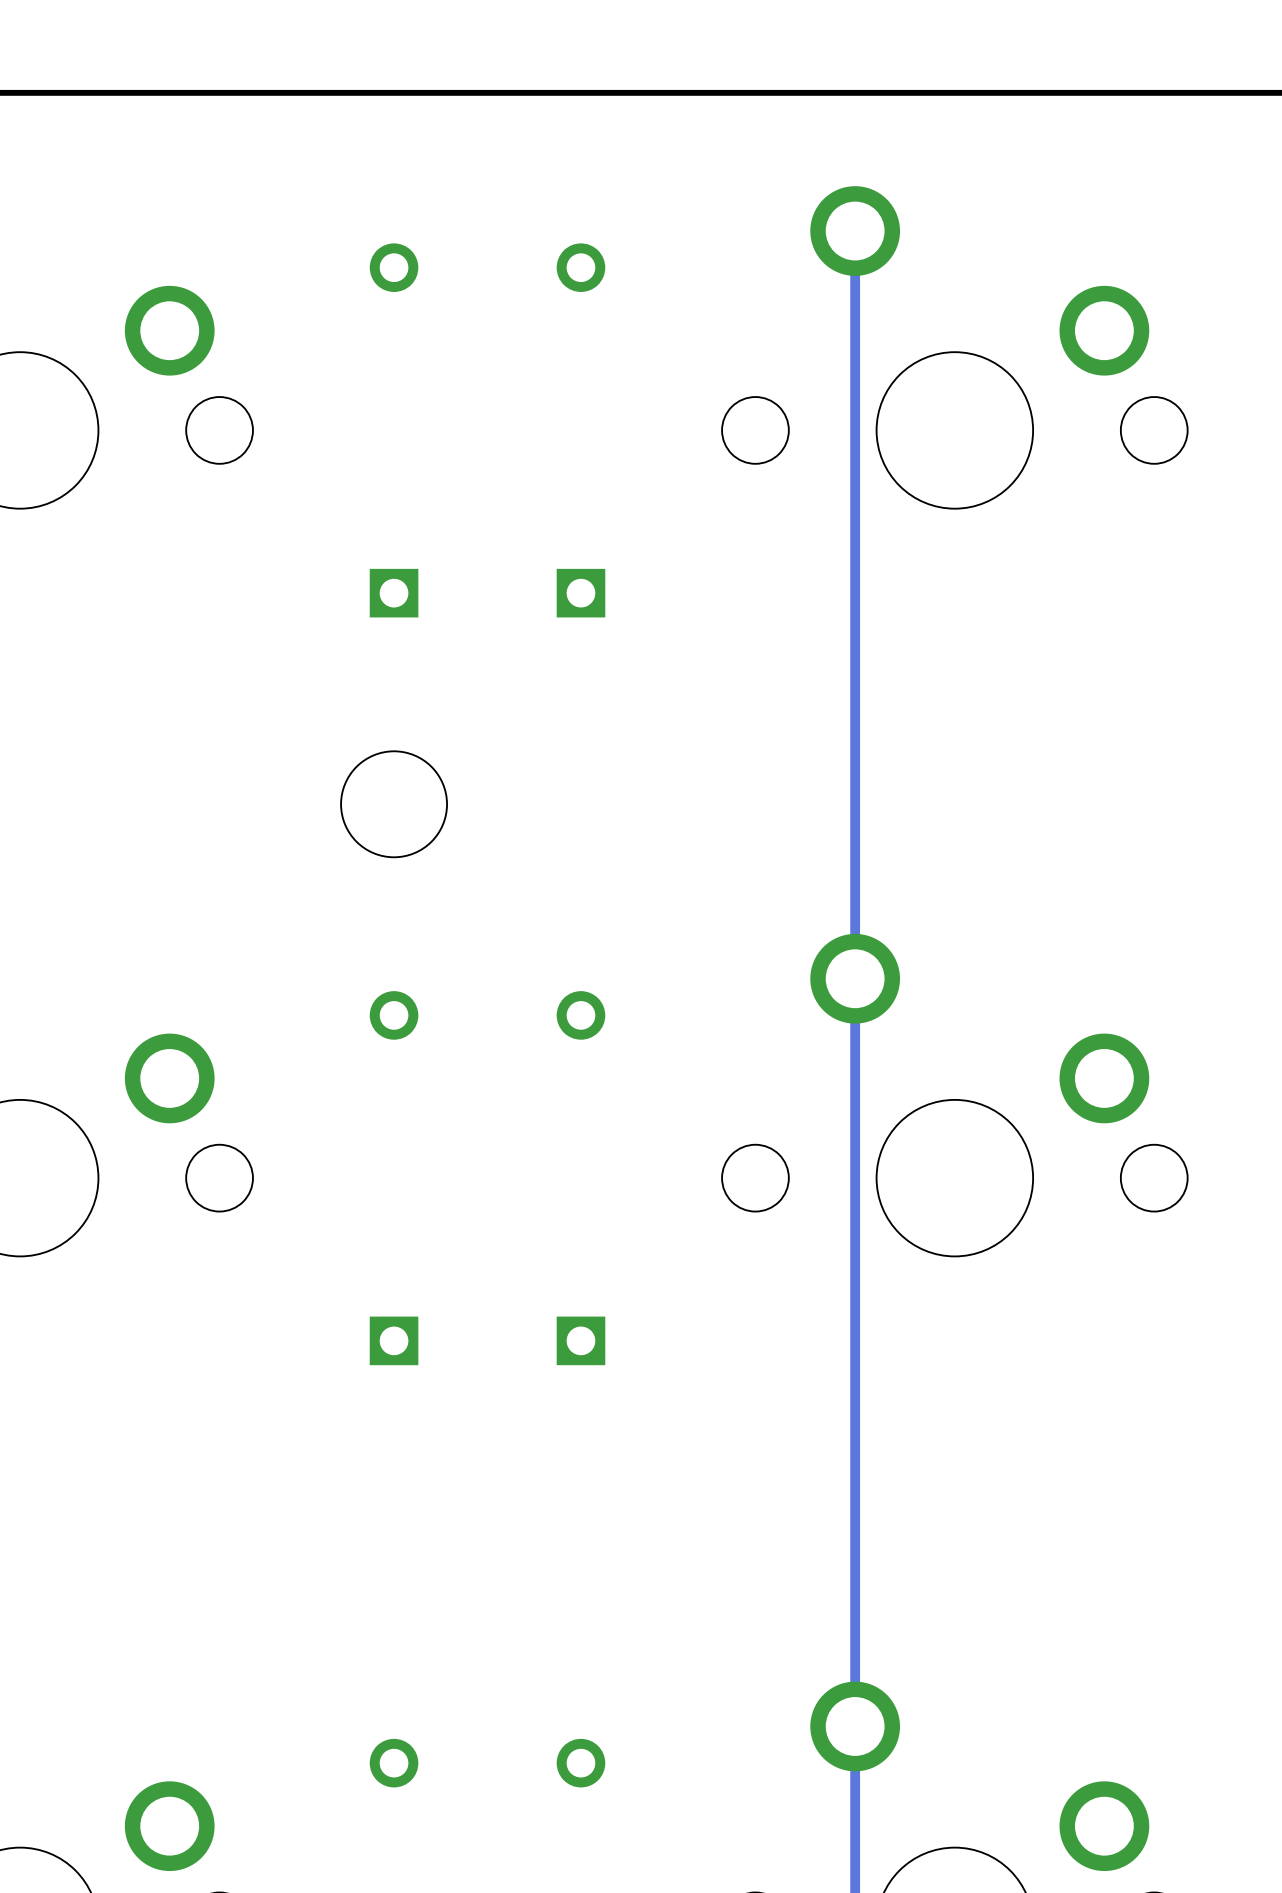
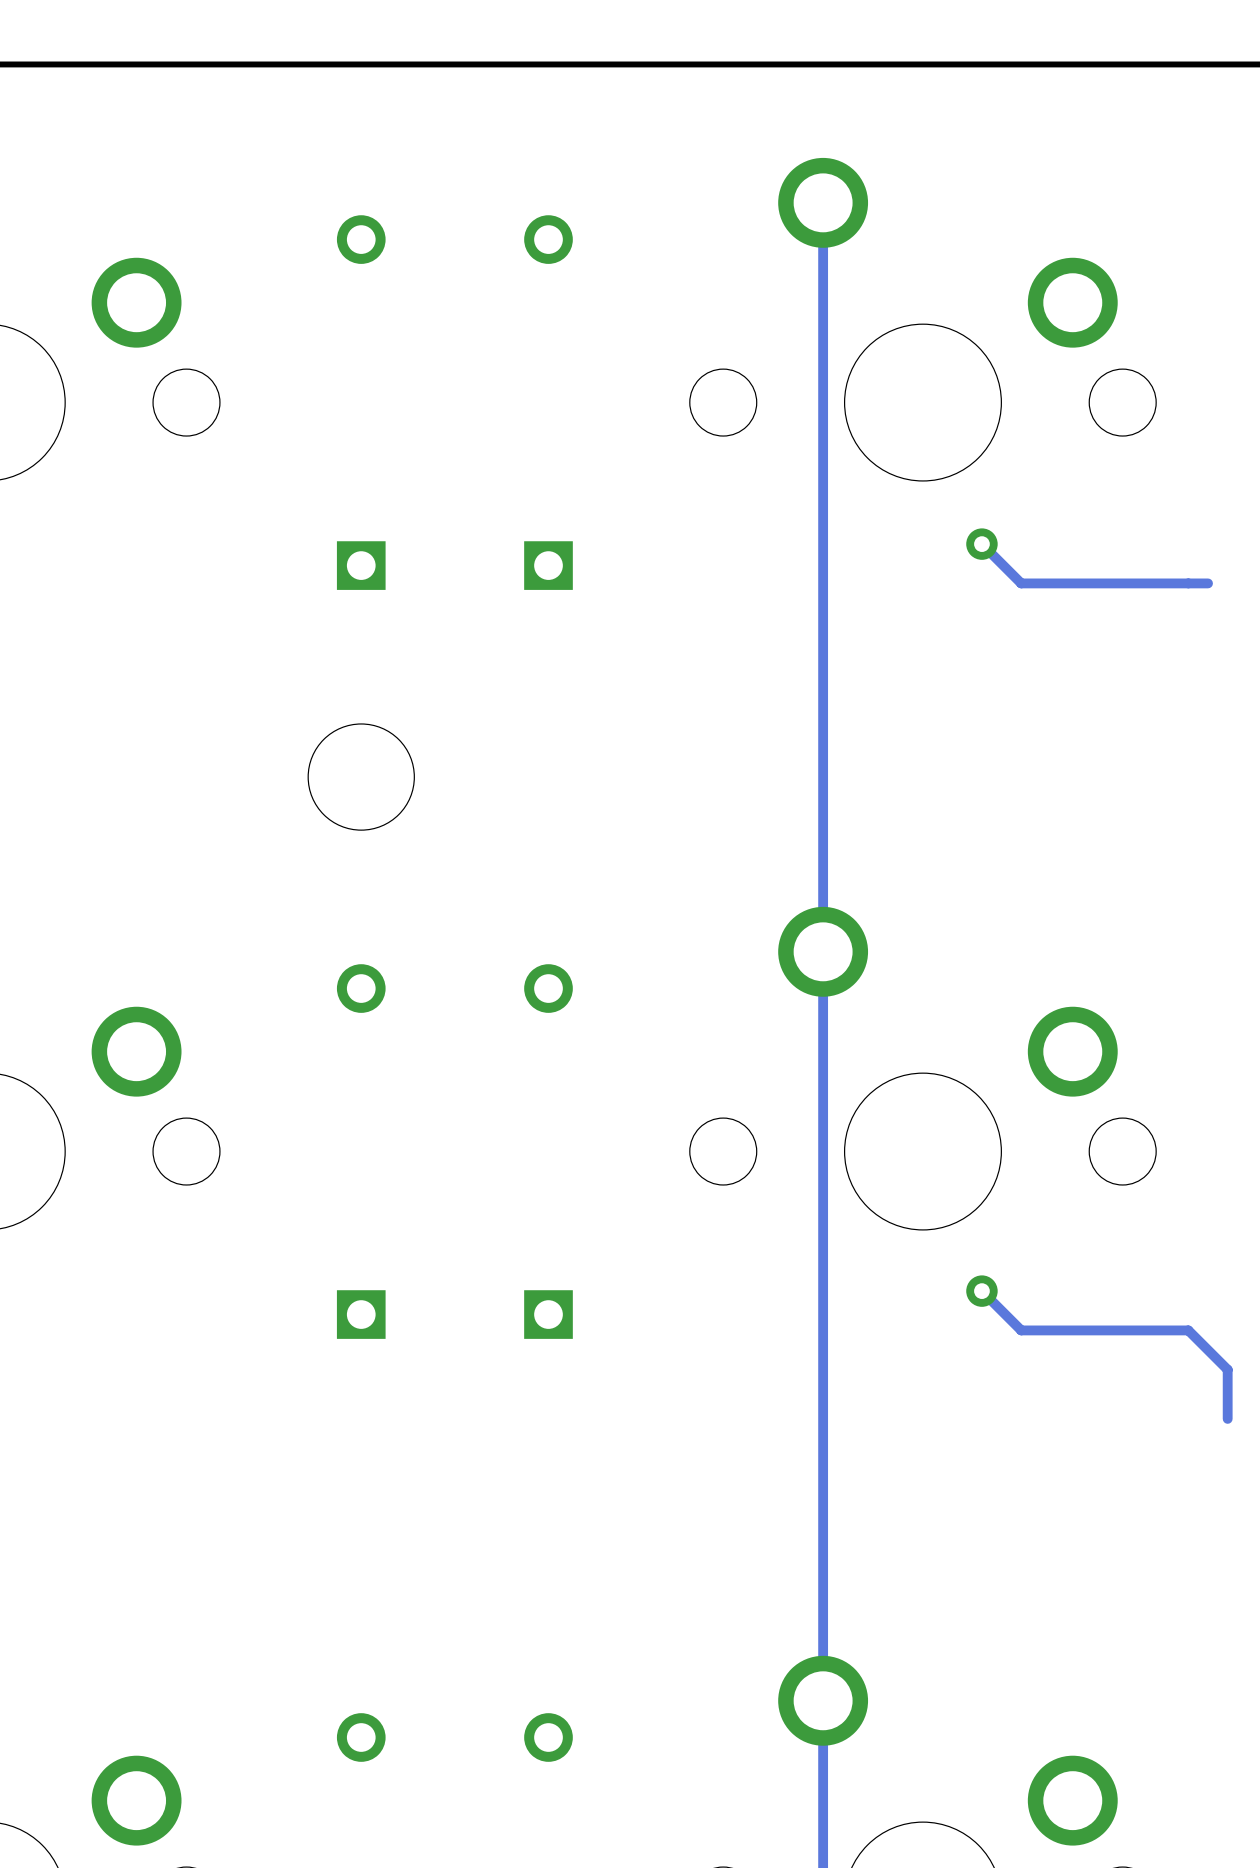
track: none -> (981, 544) (1021, 583) (1208, 583)
via: none -> (981, 544)
track: none -> (981, 1291) (1021, 1330) (1188, 1330) (1227, 1369) (1227, 1418)
via: none -> (981, 1291)

